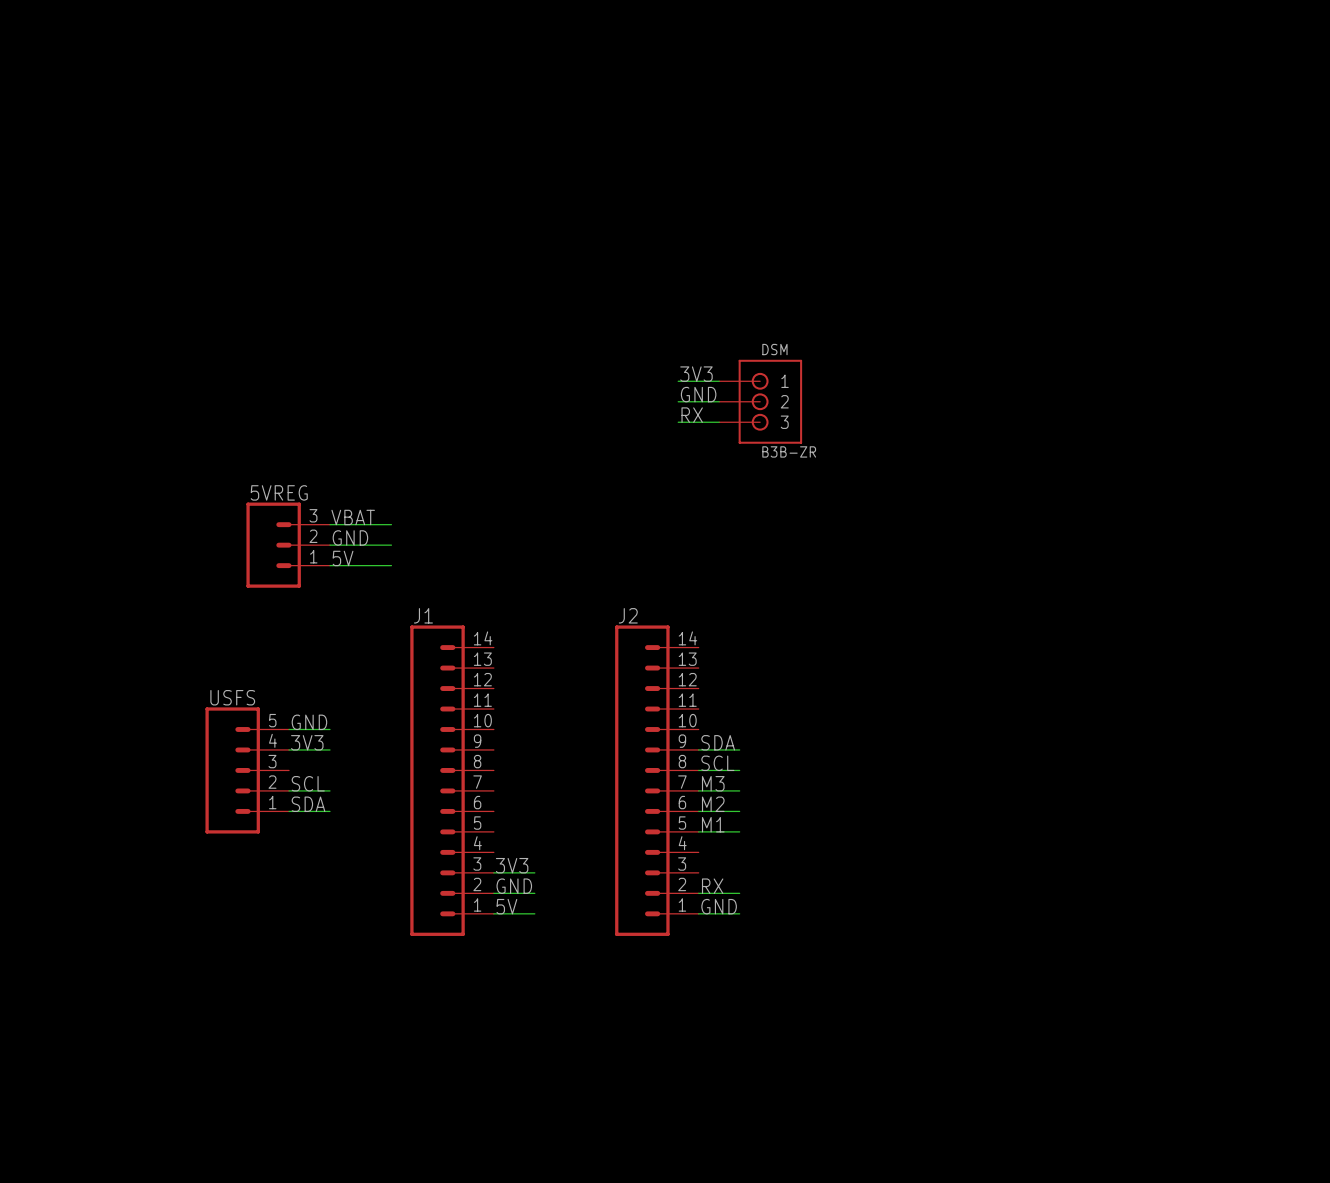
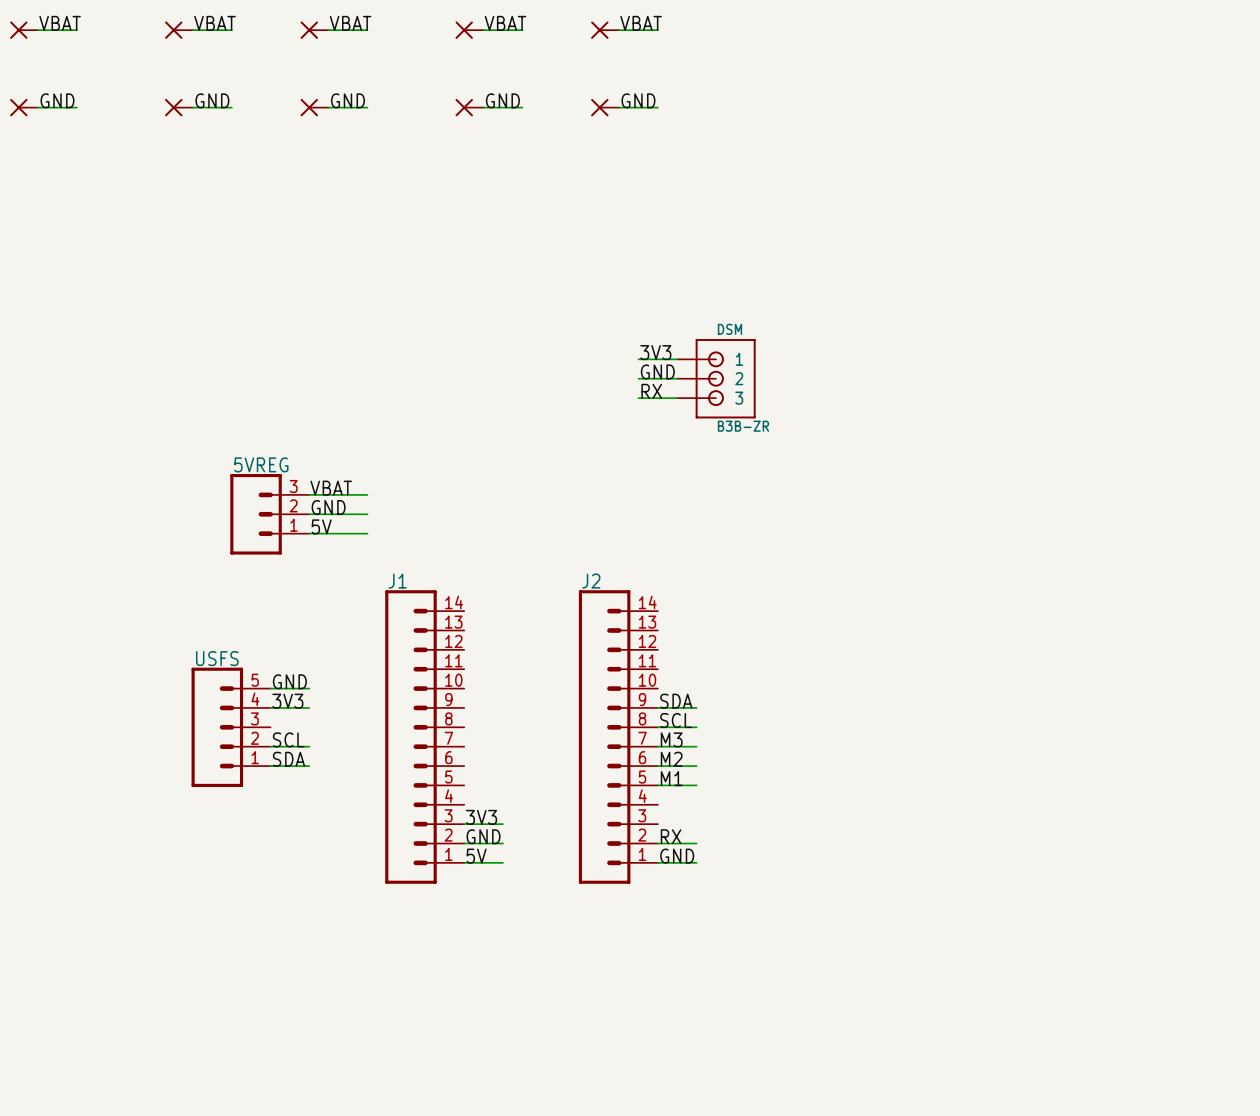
label: none -> VBAT (60, 23)
label: none -> VBAT (215, 23)
label: none -> VBAT (350, 23)
label: none -> VBAT (505, 23)
label: none -> VBAT (641, 23)
part: none -> (24, 30)
wire: none -> (38, 30) (76, 30)
part: none -> (179, 30)
wire: none -> (193, 30) (231, 30)
part: none -> (314, 30)
wire: none -> (328, 30) (367, 30)
part: none -> (469, 30)
wire: none -> (483, 30) (522, 30)
part: none -> (605, 30)
wire: none -> (619, 30) (657, 30)
label: none -> GND (57, 100)
label: none -> GND (212, 100)
label: none -> GND (347, 100)
label: none -> GND (502, 100)
label: none -> GND (638, 100)
part: none -> (24, 107)
wire: none -> (38, 107) (76, 107)
part: none -> (179, 107)
wire: none -> (193, 107) (231, 107)
part: none -> (314, 107)
wire: none -> (328, 107) (367, 107)
part: none -> (469, 107)
wire: none -> (483, 107) (522, 107)
part: none -> (605, 107)
wire: none -> (619, 107) (657, 107)

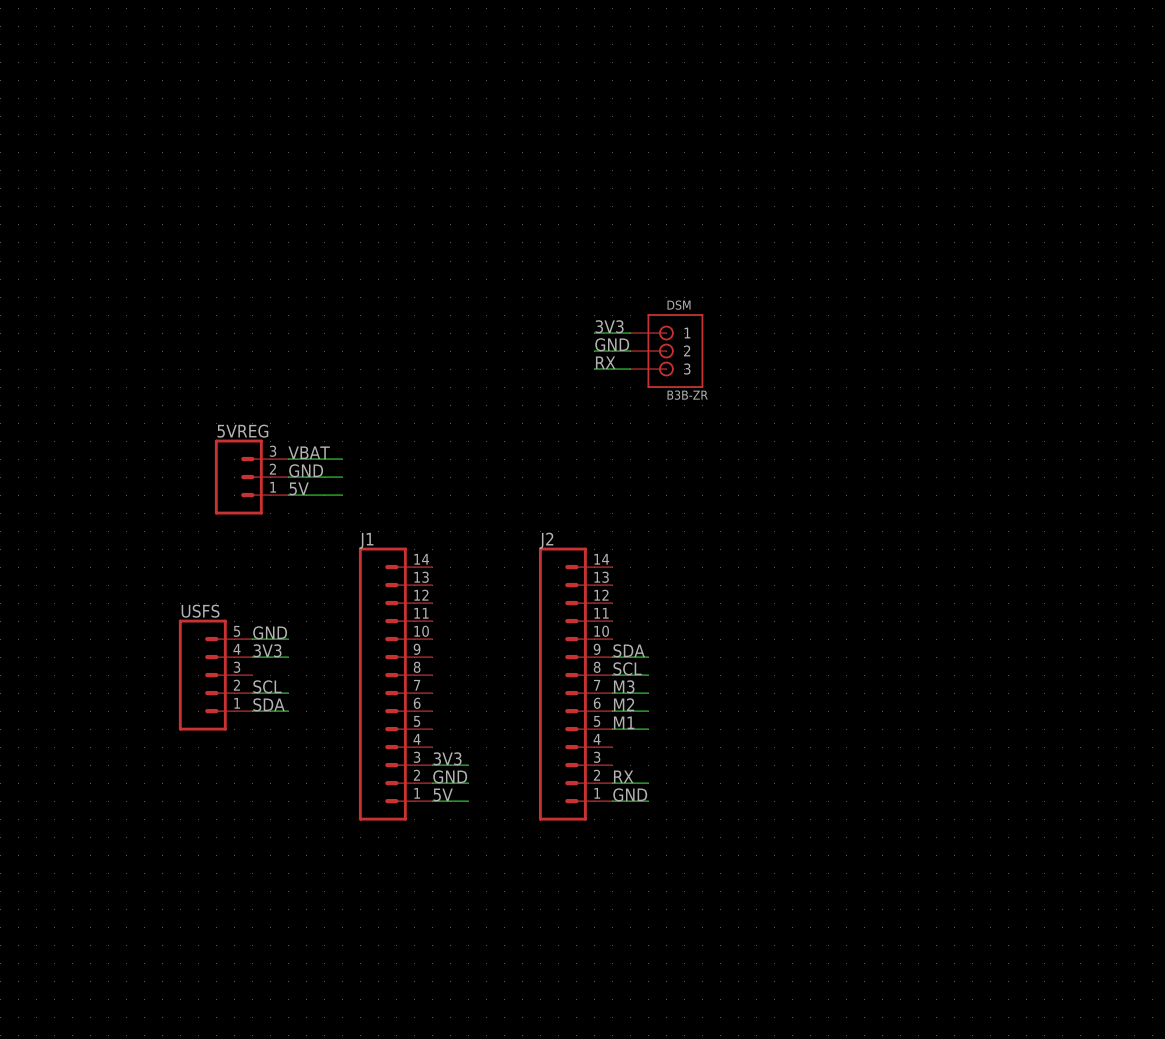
label: VBAT (60, 23) -> none
label: VBAT (215, 23) -> none
label: VBAT (350, 23) -> none
label: VBAT (505, 23) -> none
label: VBAT (641, 23) -> none
part: (24, 30) -> none
wire: (38, 30) (76, 30) -> none
part: (179, 30) -> none
wire: (193, 30) (231, 30) -> none
part: (314, 30) -> none
wire: (328, 30) (367, 30) -> none
part: (469, 30) -> none
wire: (483, 30) (522, 30) -> none
part: (605, 30) -> none
wire: (619, 30) (657, 30) -> none
label: GND (57, 100) -> none
label: GND (212, 100) -> none
label: GND (347, 100) -> none
label: GND (502, 100) -> none
label: GND (638, 100) -> none
part: (24, 107) -> none
wire: (38, 107) (76, 107) -> none
part: (179, 107) -> none
wire: (193, 107) (231, 107) -> none
part: (314, 107) -> none
wire: (328, 107) (367, 107) -> none
part: (469, 107) -> none
wire: (483, 107) (522, 107) -> none
part: (605, 107) -> none
wire: (619, 107) (657, 107) -> none

